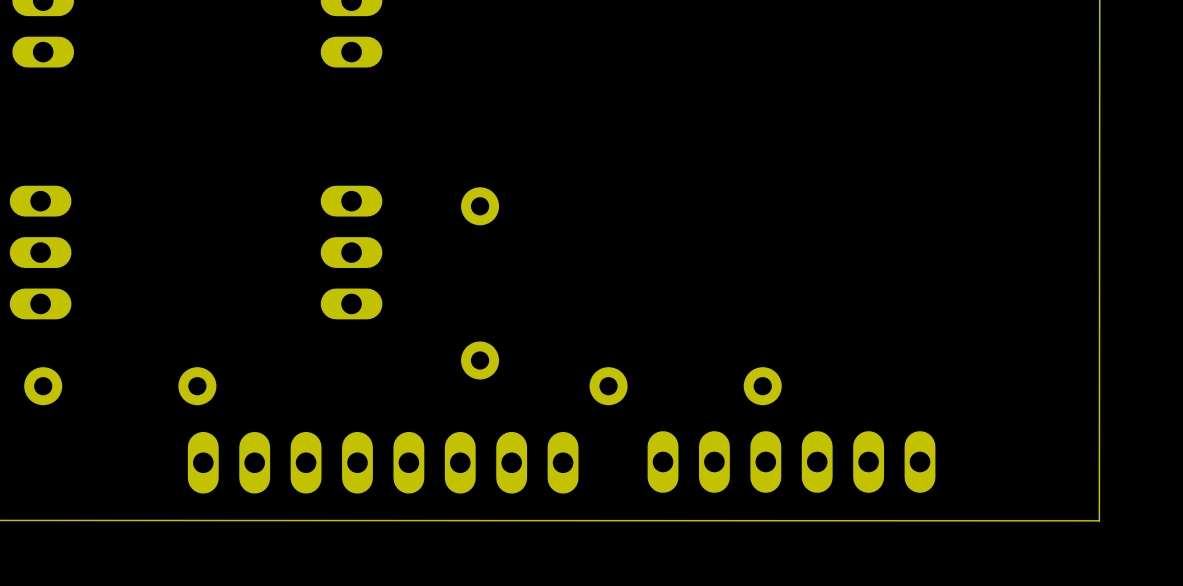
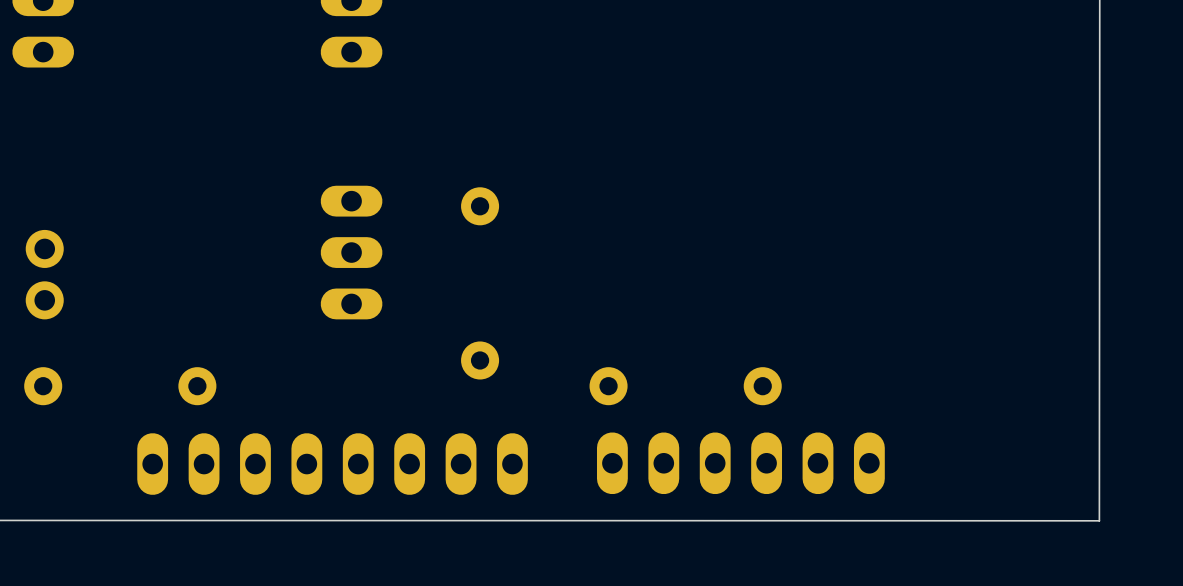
part: (40, 252) -> none
part: none -> (44, 274)
part position: (791, 461) -> (740, 463)
part position: (383, 462) -> (332, 464)

